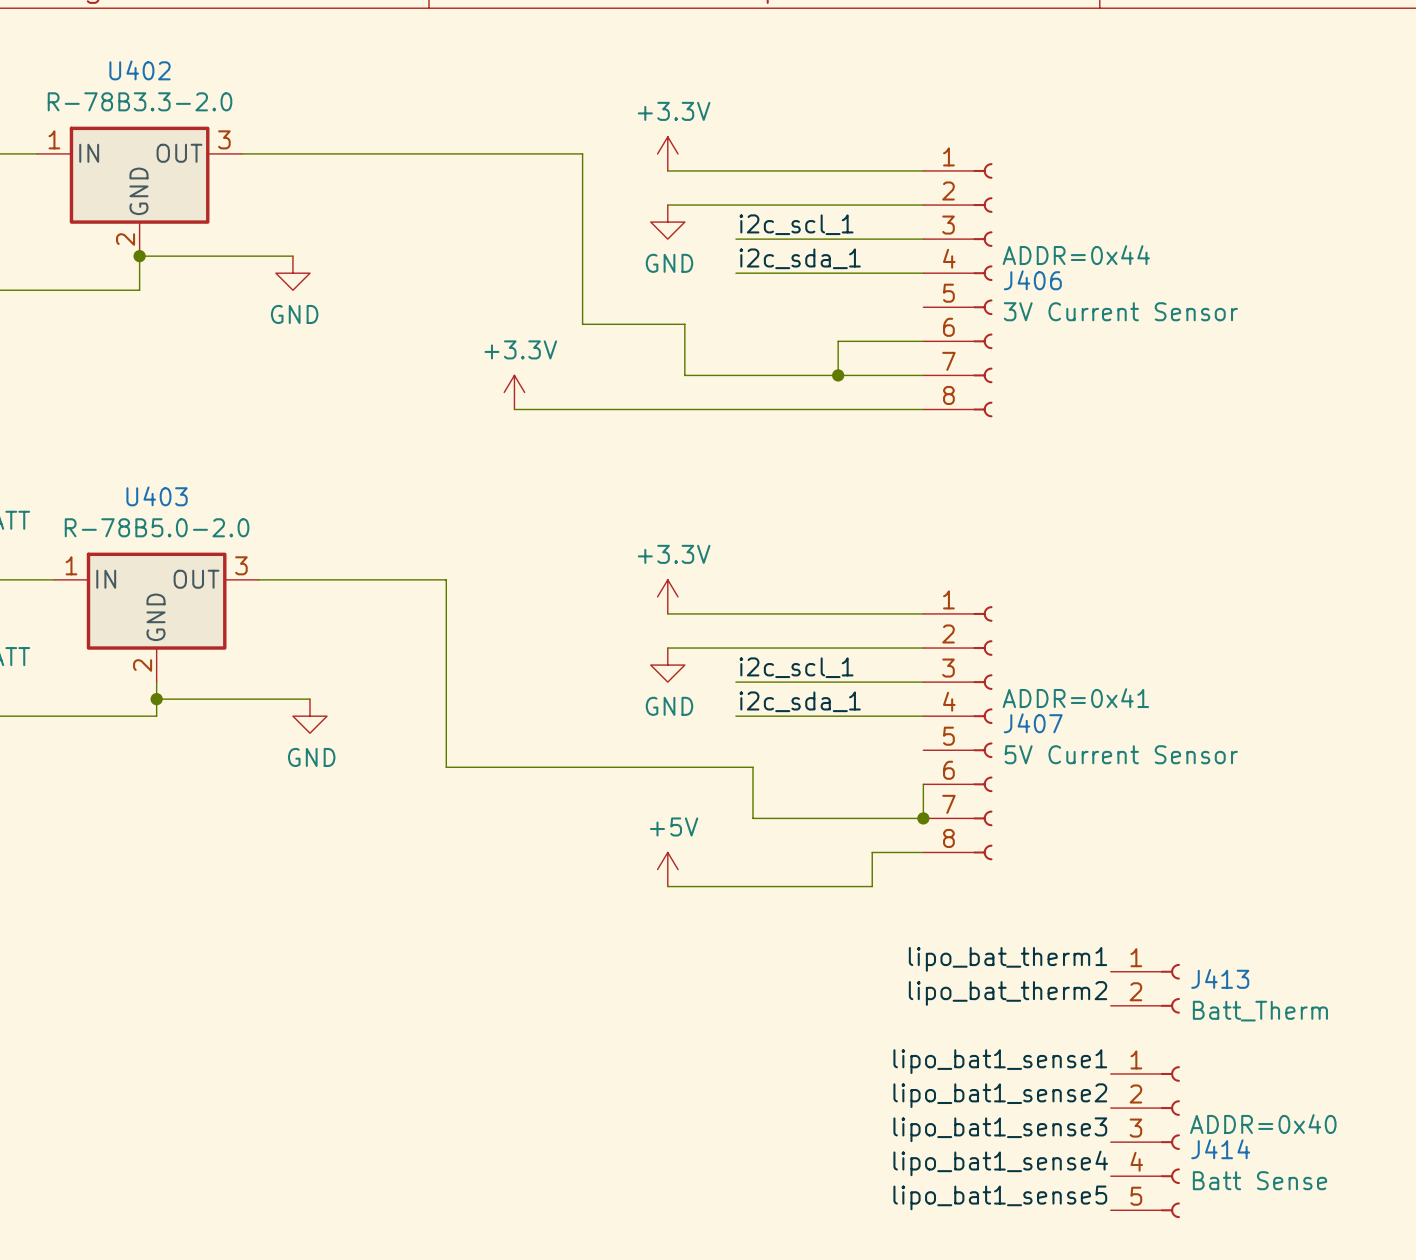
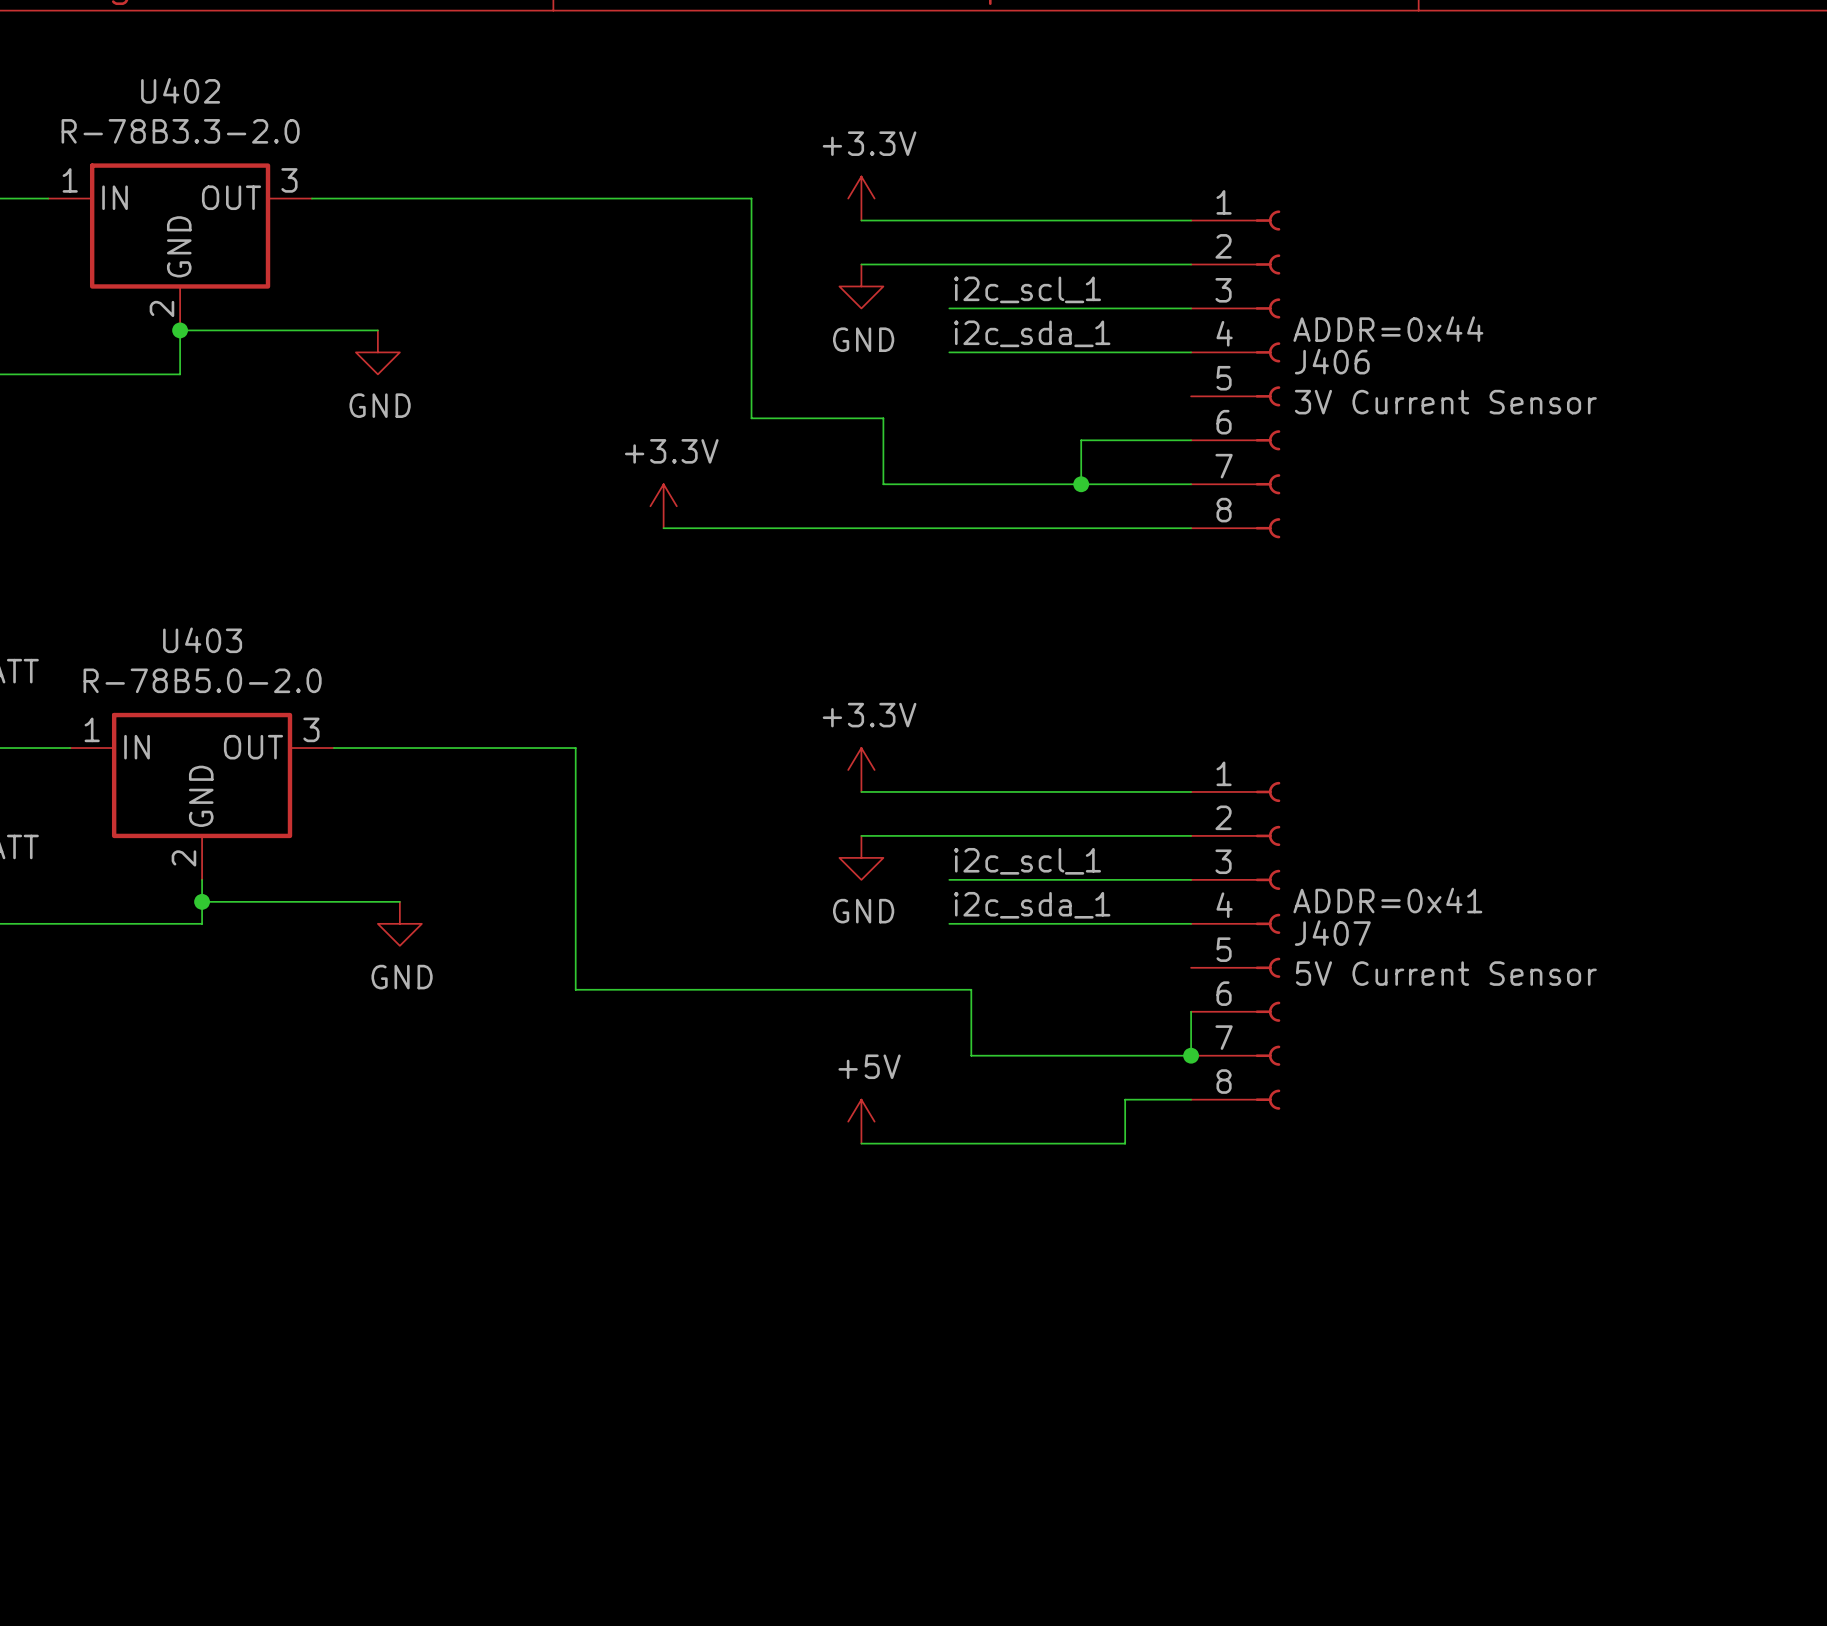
label: lipo_bat_therm1 (1008, 959) -> none
J413: Batt_Therm (1145, 988) -> none
label: lipo_bat_therm2 (1008, 993) -> none
label: lipo_bat1_sense1 (1000, 1061) -> none
label: lipo_bat1_sense2 (1000, 1095) -> none
label: lipo_bat1_sense3 (1000, 1129) -> none
J414: Batt Sense (1145, 1142) -> none
label: lipo_bat1_sense4 (1000, 1163) -> none
label: lipo_bat1_sense5 (1000, 1197) -> none

